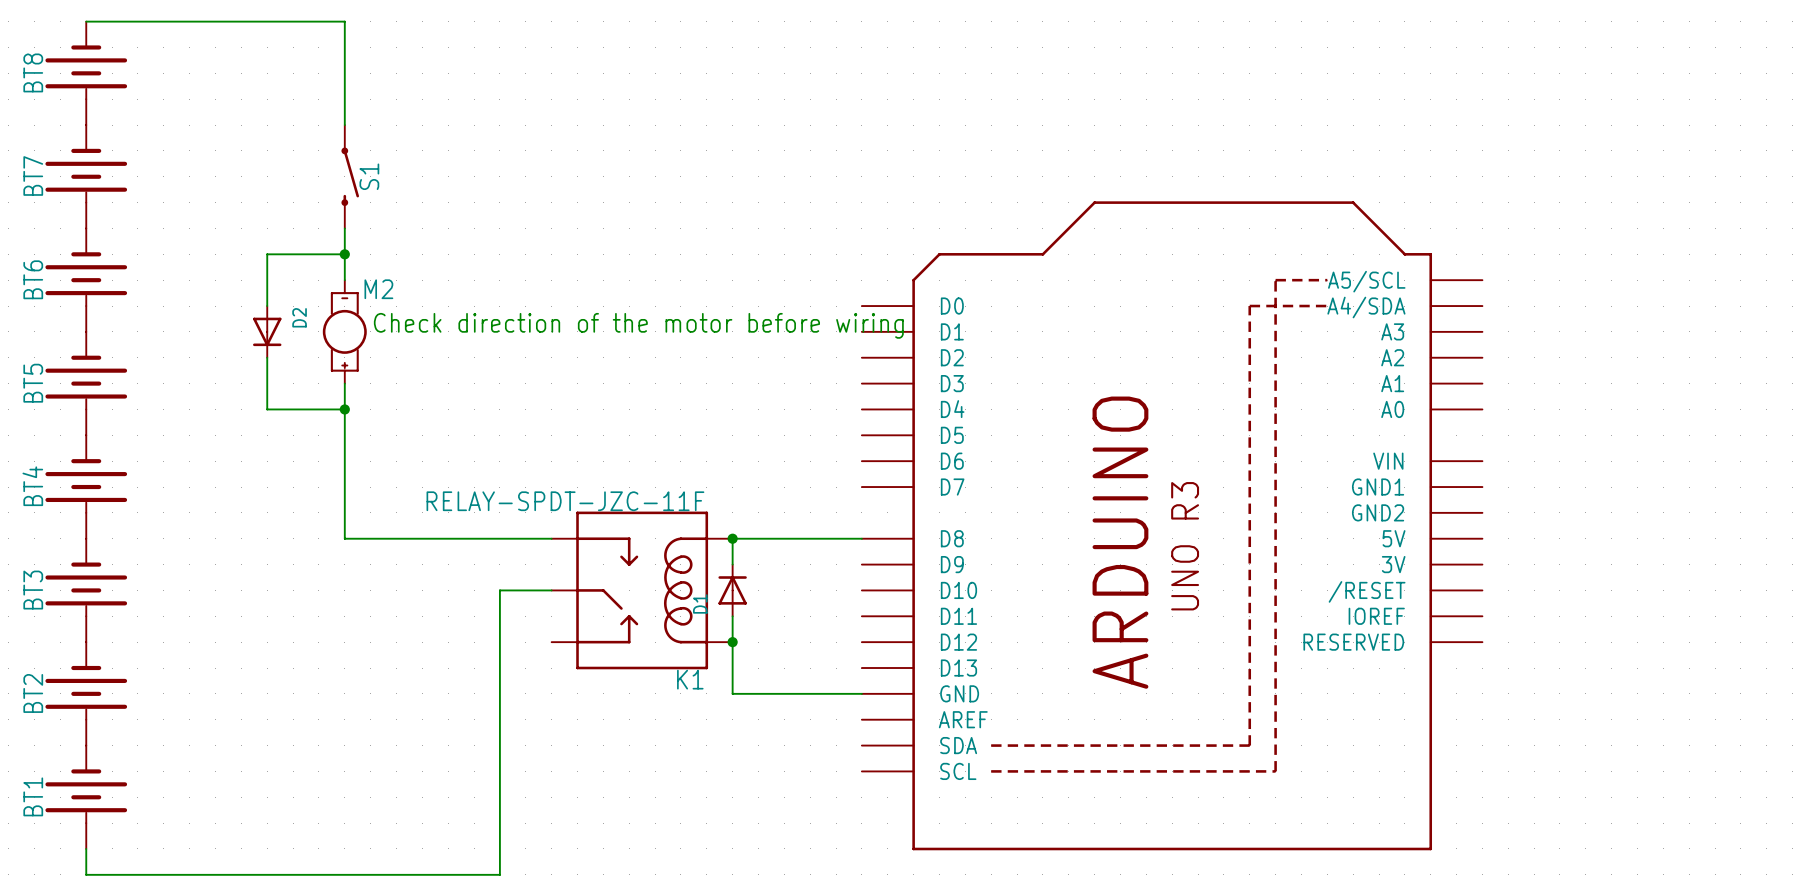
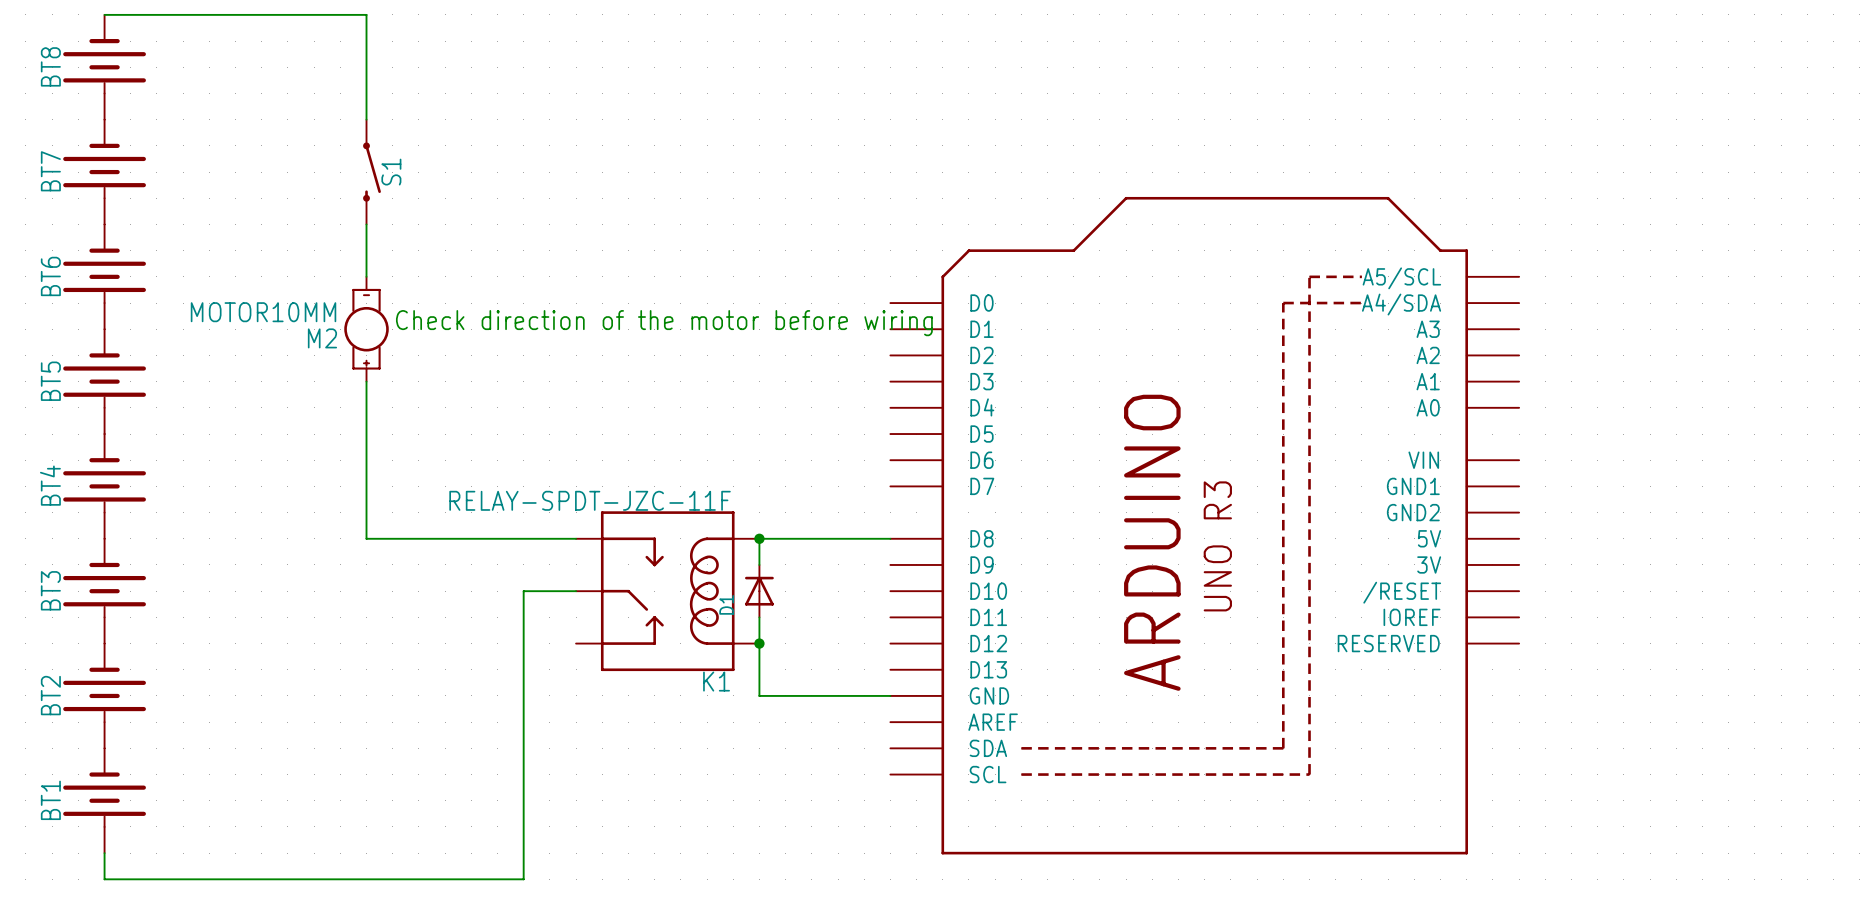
wire: (344, 254) (267, 254) (267, 306) -> none
junction: (344, 254) -> none
M2 name position: M2 (378, 289) -> M2 (322, 338)
M2 value: none -> MOTOR10MM (263, 312)
D2: (267, 331) -> none
wire: (267, 357) (267, 409) (344, 409) -> none
junction: (344, 409) -> none

